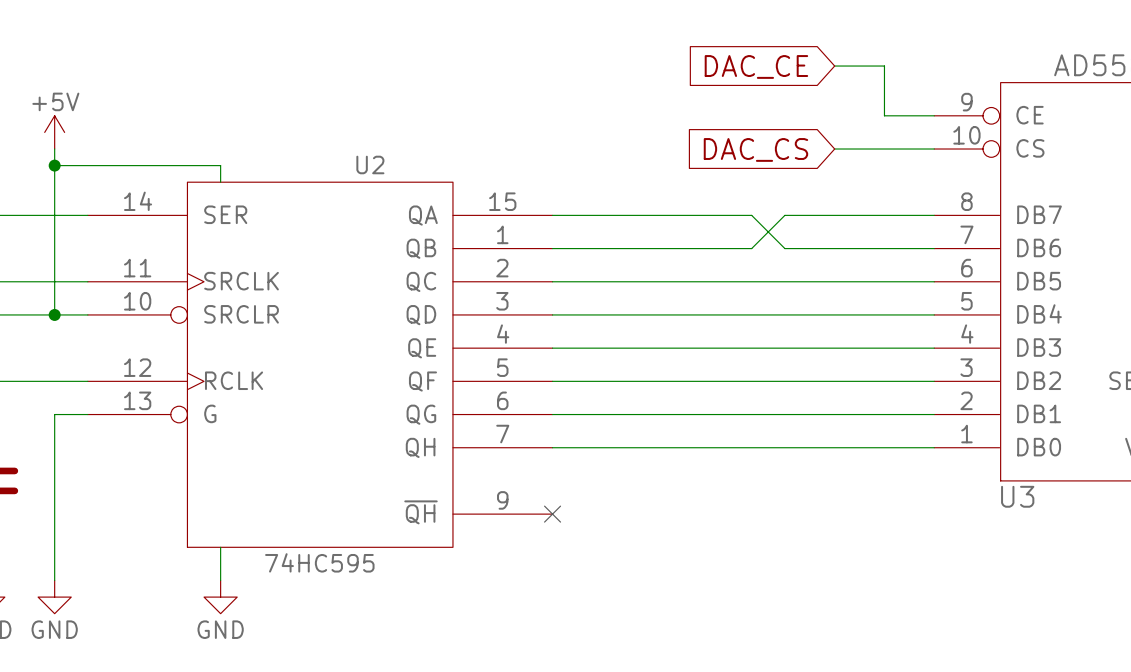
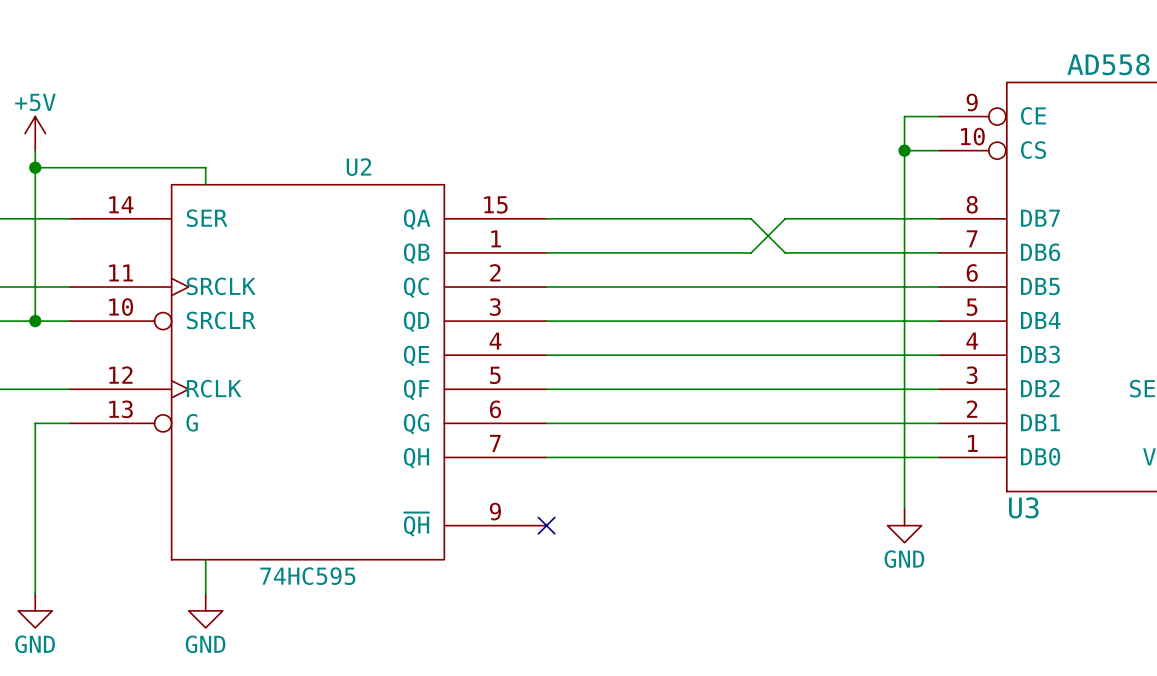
global label: DAC_CE (756, 66) -> none
wire: (834, 66) (884, 66) (884, 115) (901, 115) -> (904, 508) (904, 116)
global label: DAC_CS (755, 149) -> none
wire: (834, 149) (901, 149) -> none
junction: none -> (904, 150)
power symbol: none -> GND (904, 525)

